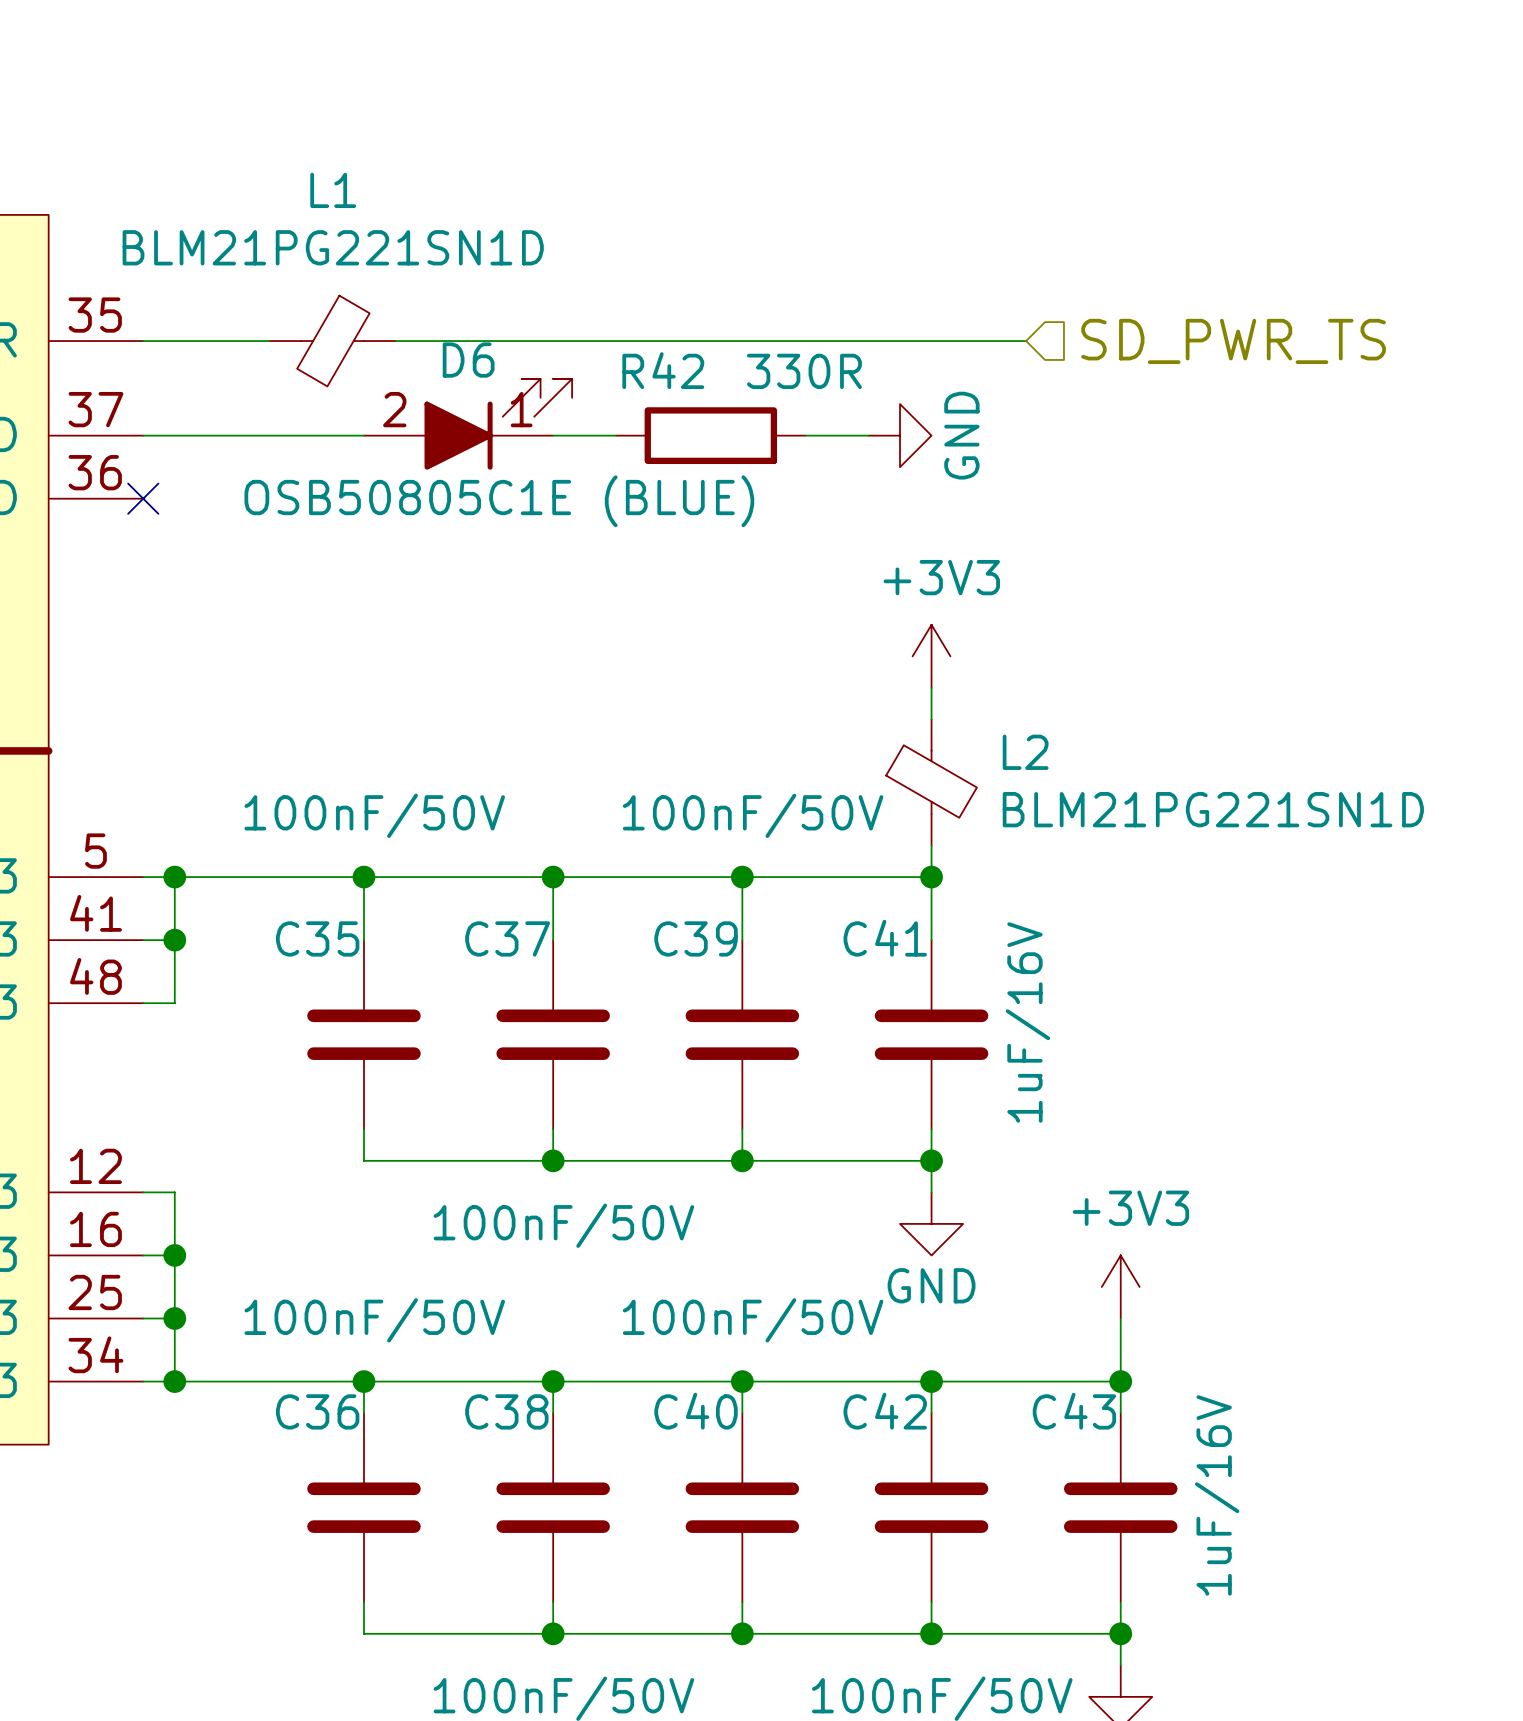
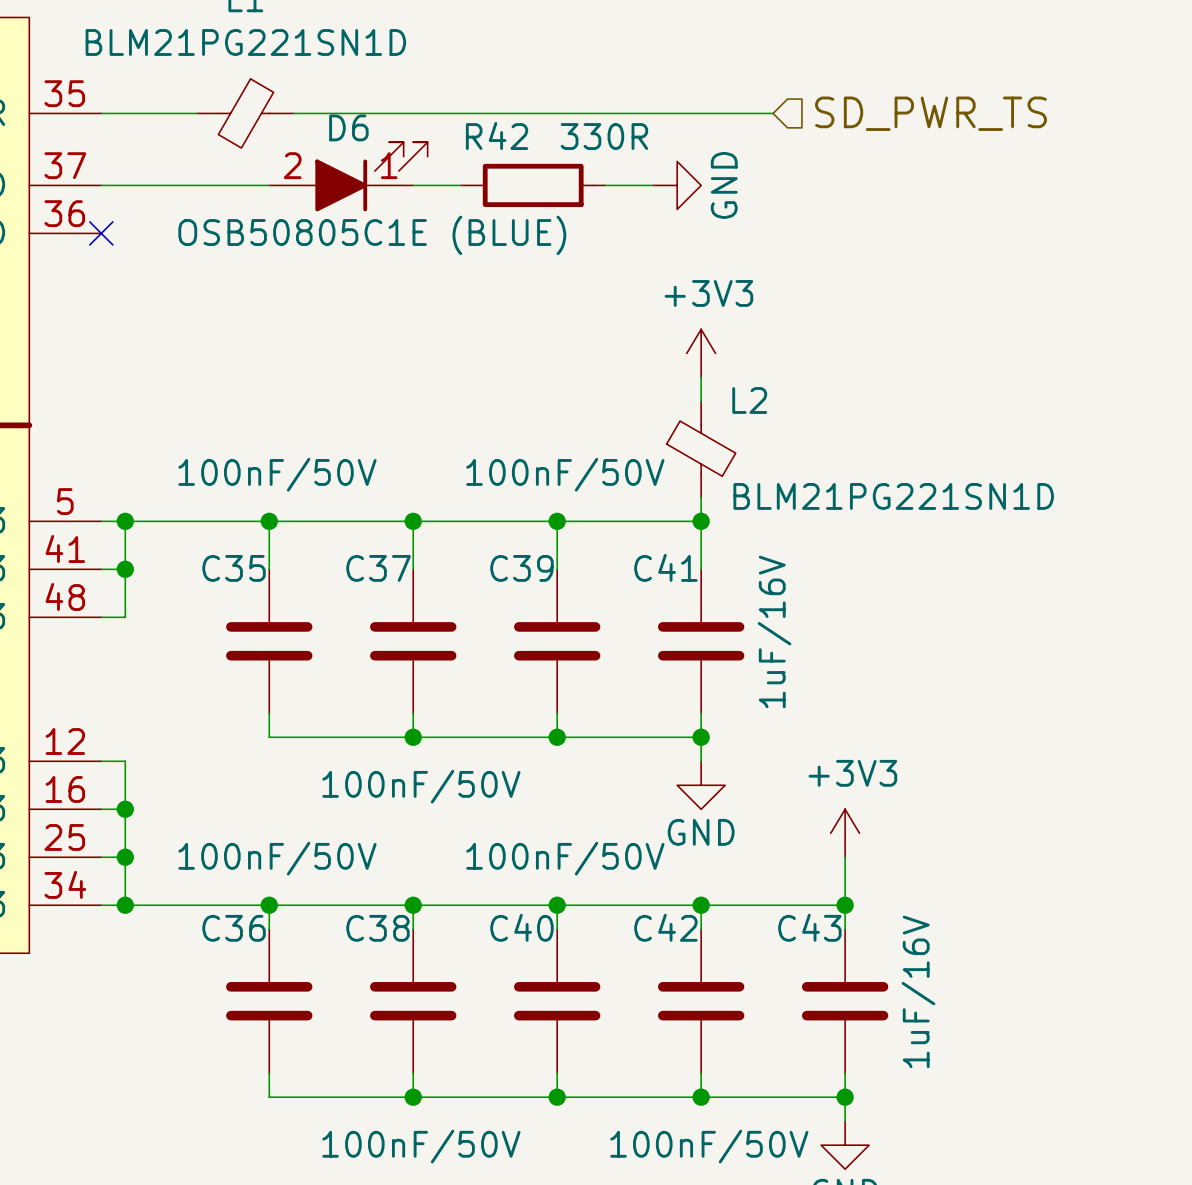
L2 name position: L2 (1025, 752) -> L2 (749, 400)
L2 value position: BLM21PG221SN1D (1213, 809) -> BLM21PG221SN1D (893, 496)

